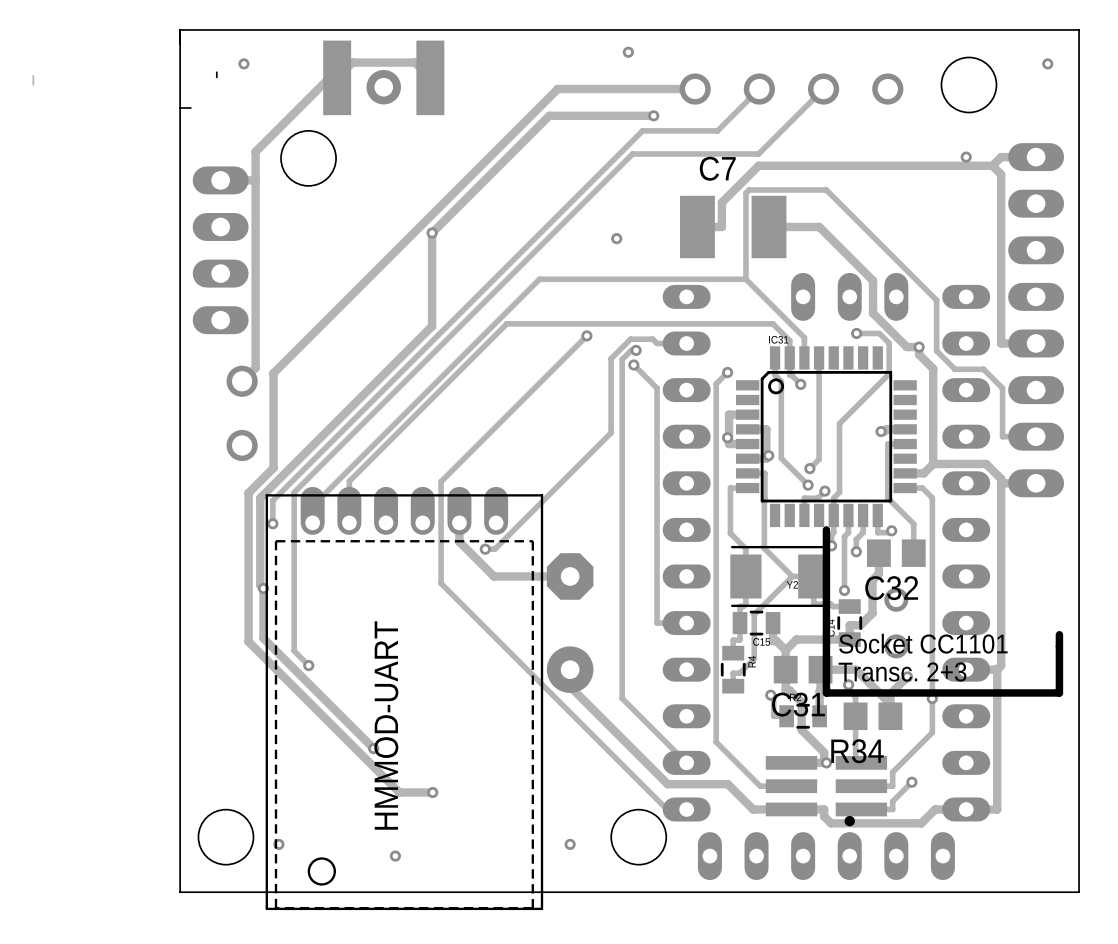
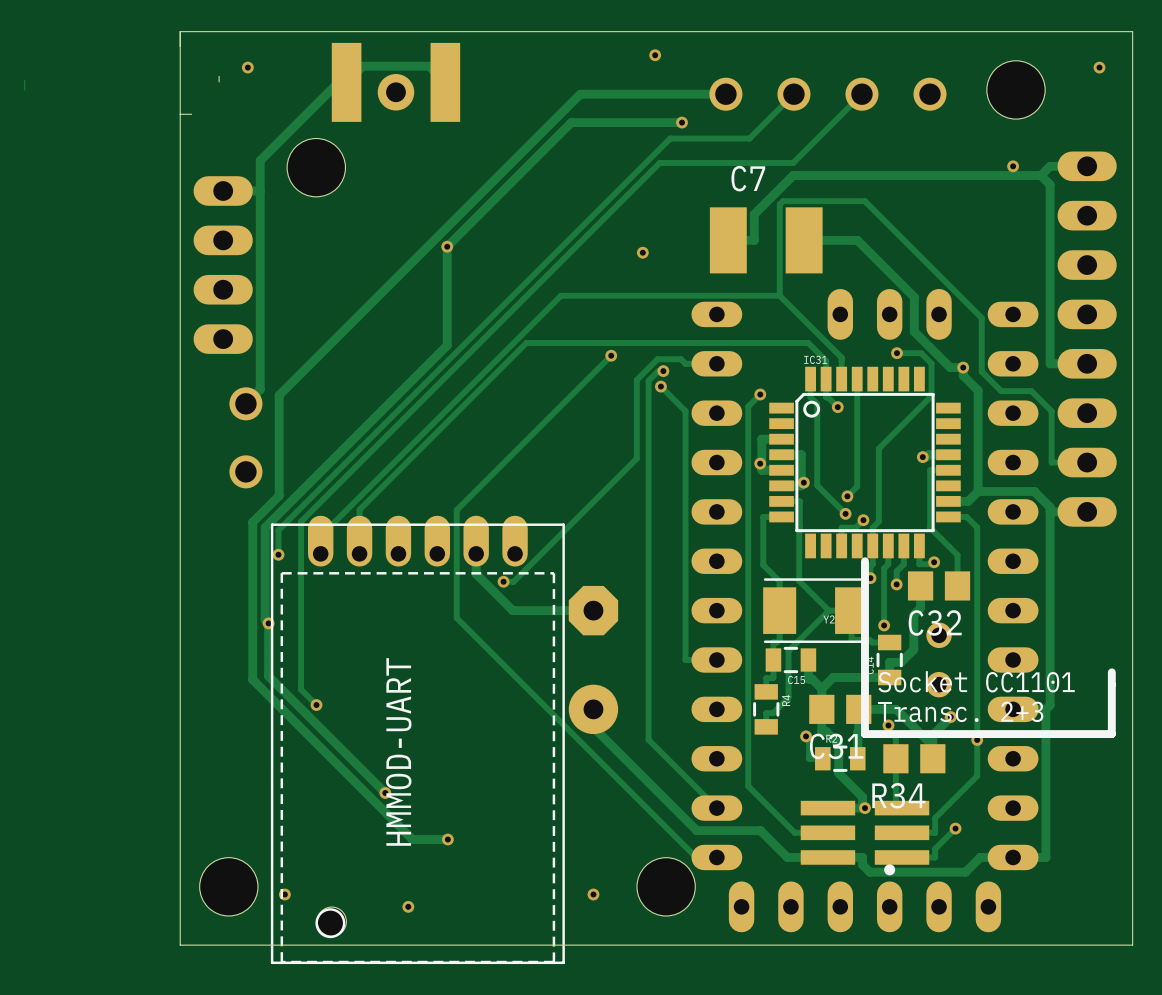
hole: none -> (331, 921)

